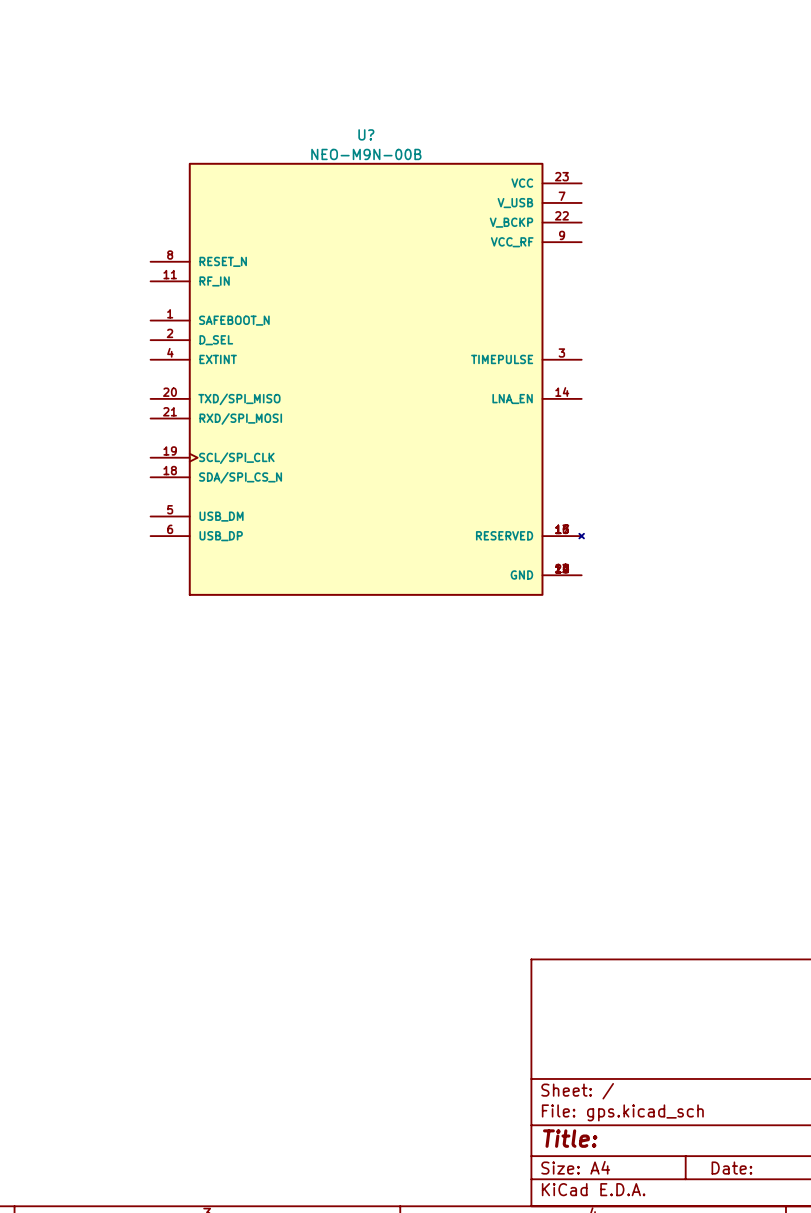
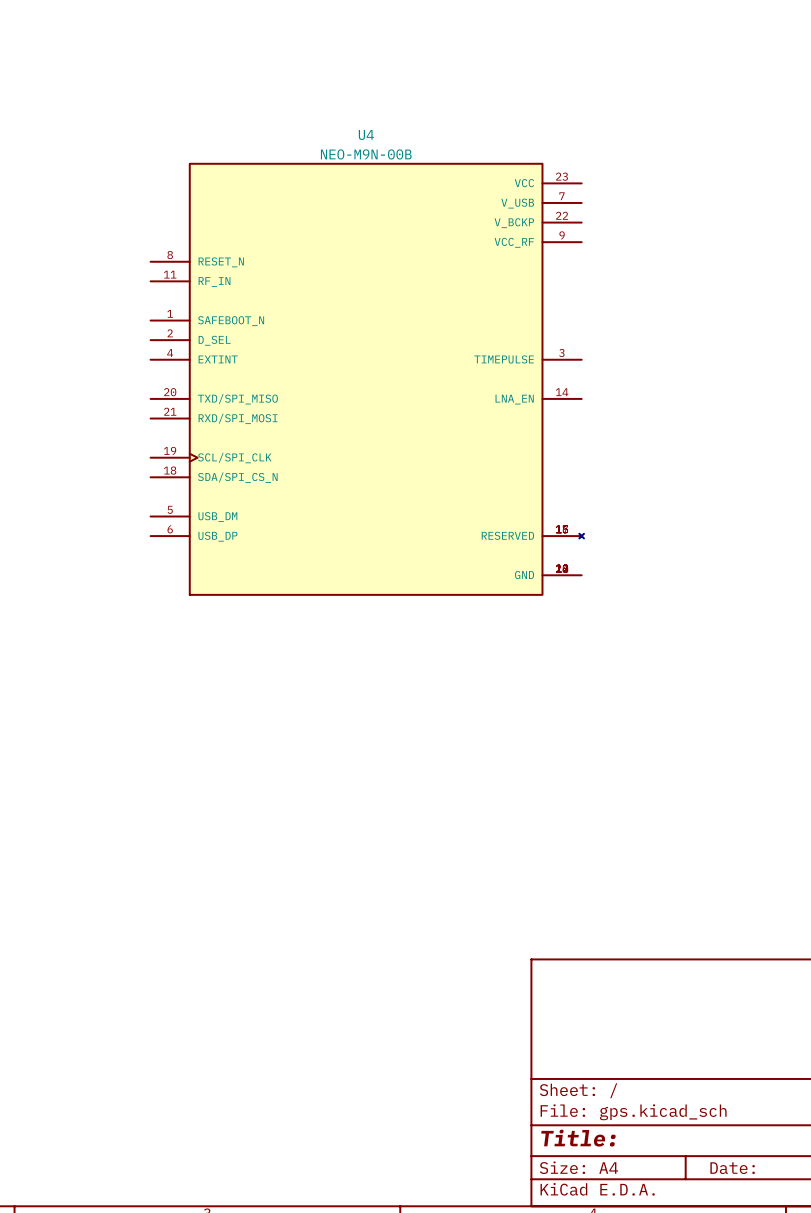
U? name: U? (366, 134) -> U4 (366, 134)

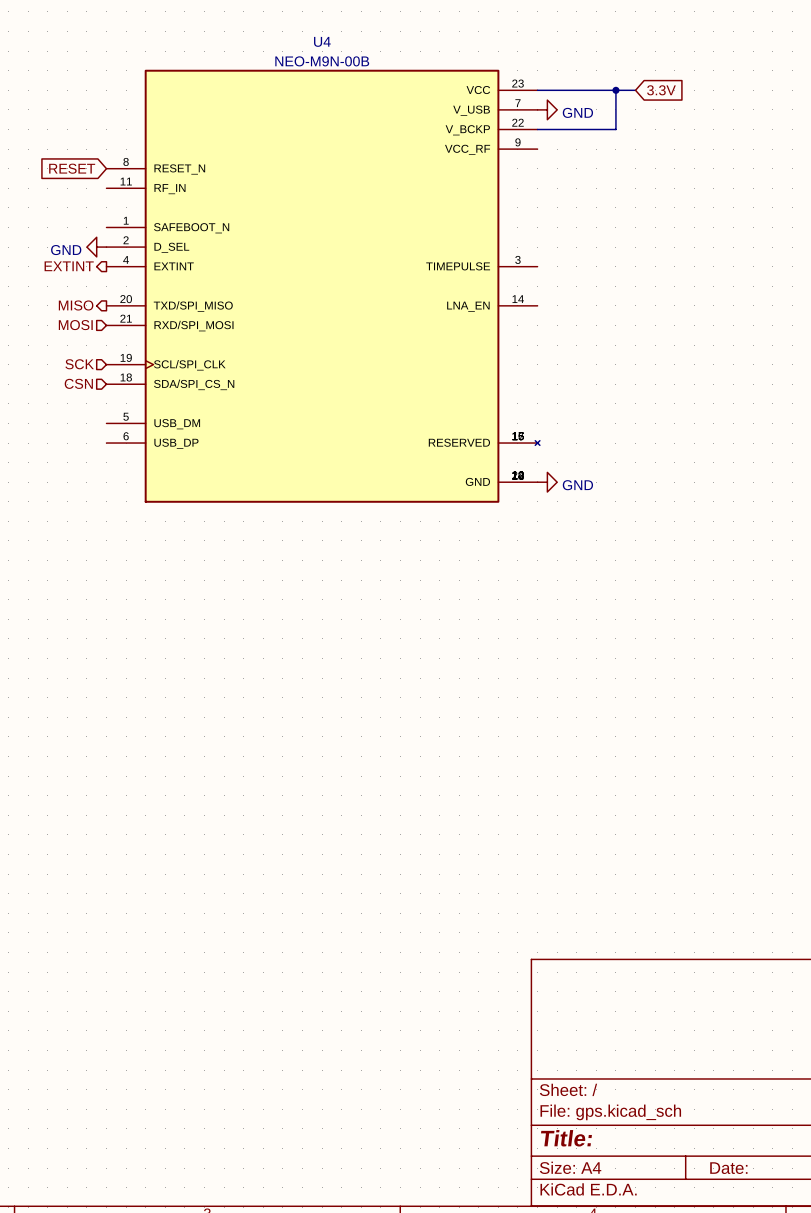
wire: none -> (537, 90) (635, 90)
wire: none -> (615, 90) (615, 129) (537, 129)
junction: none -> (615, 90)
global label: none -> 3.3V (661, 90)
power symbol: none -> GND (547, 109)
global label: none -> RESET (72, 168)
power symbol: none -> GND (96, 247)
hierarchical label: none -> EXTINT (69, 266)
hierarchical label: none -> MISO (76, 305)
hierarchical label: none -> MOSI (75, 325)
hierarchical label: none -> SCK (79, 364)
U4 position: (367, 379) -> (323, 286)
hierarchical label: none -> CSN (78, 383)
power symbol: none -> GND (547, 482)

